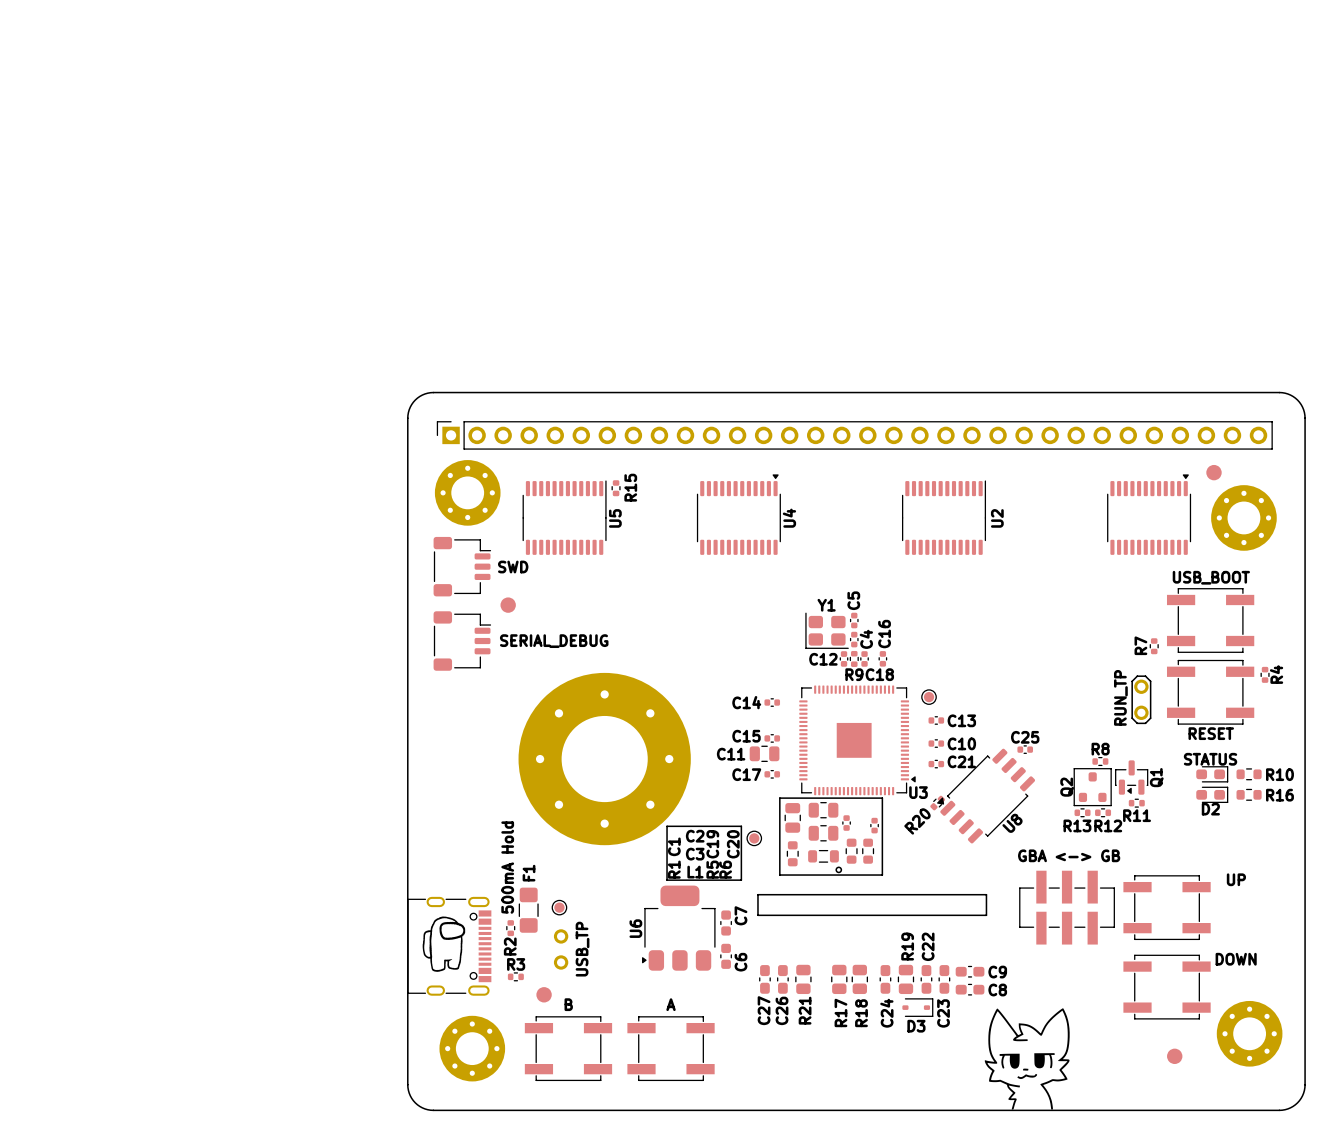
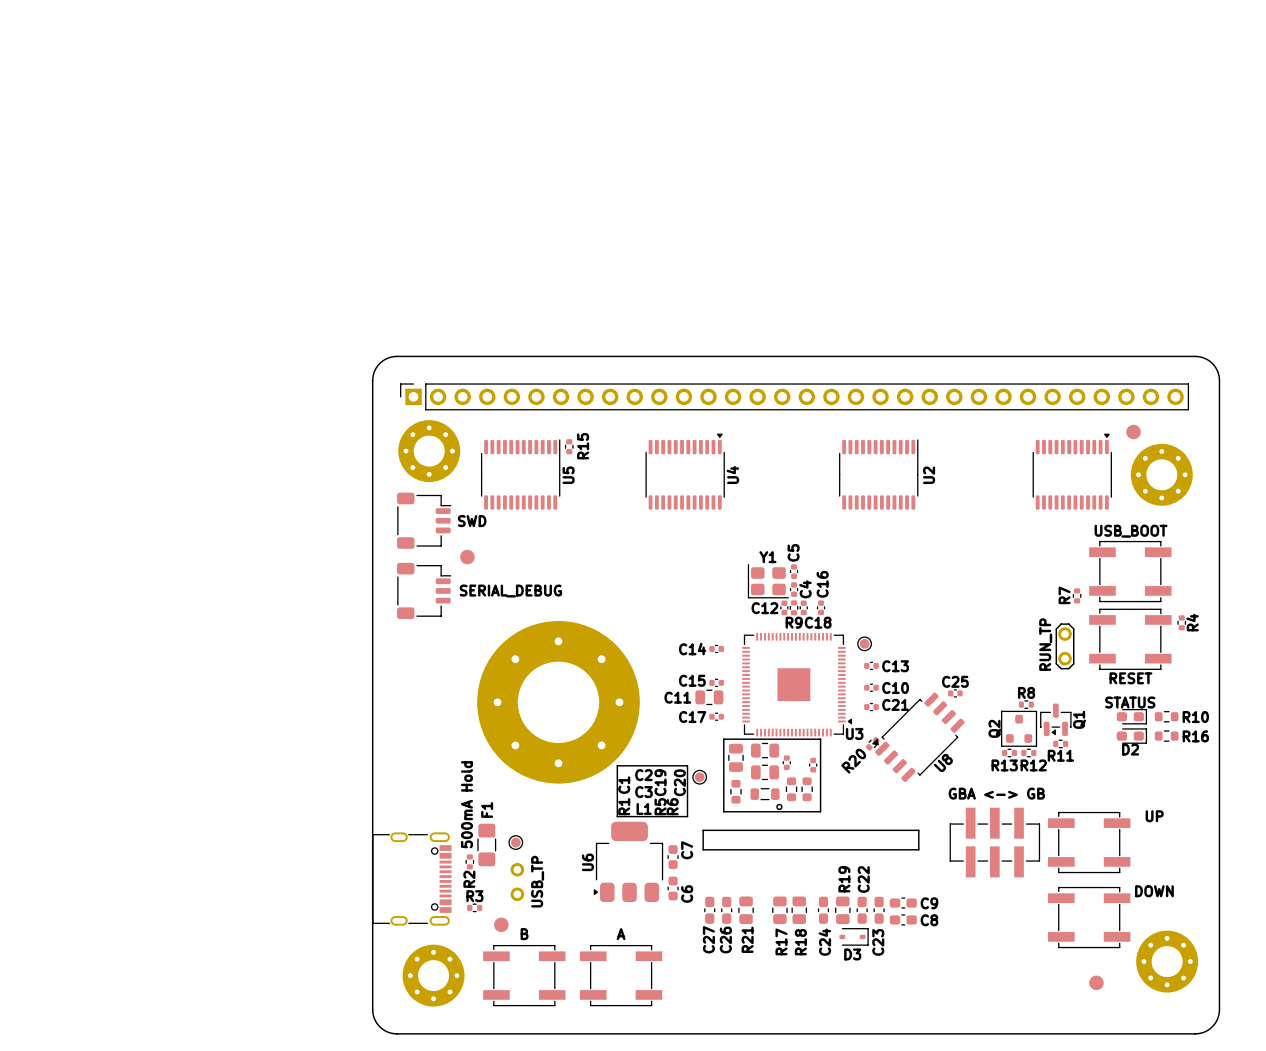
drawing: [422, 916, 466, 972] -> none
drawing: [984, 1008, 1070, 1110] -> none

